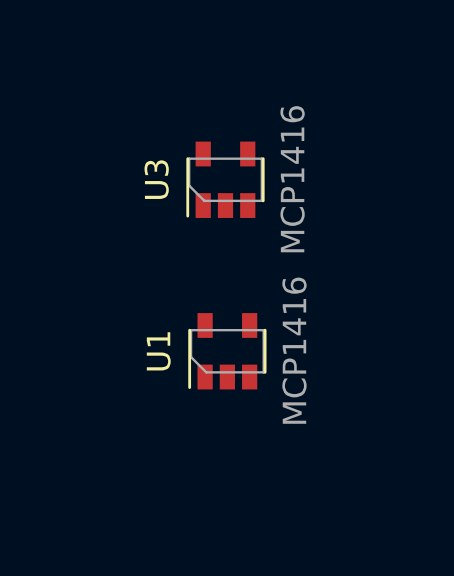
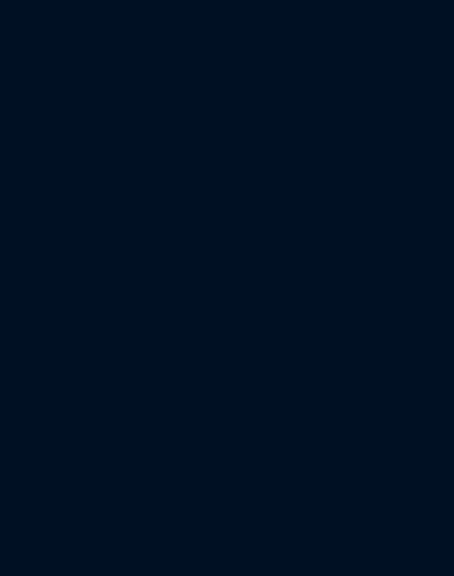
U3: MCP1416 (225, 179) -> none
U1: MCP1416 (227, 351) -> none

